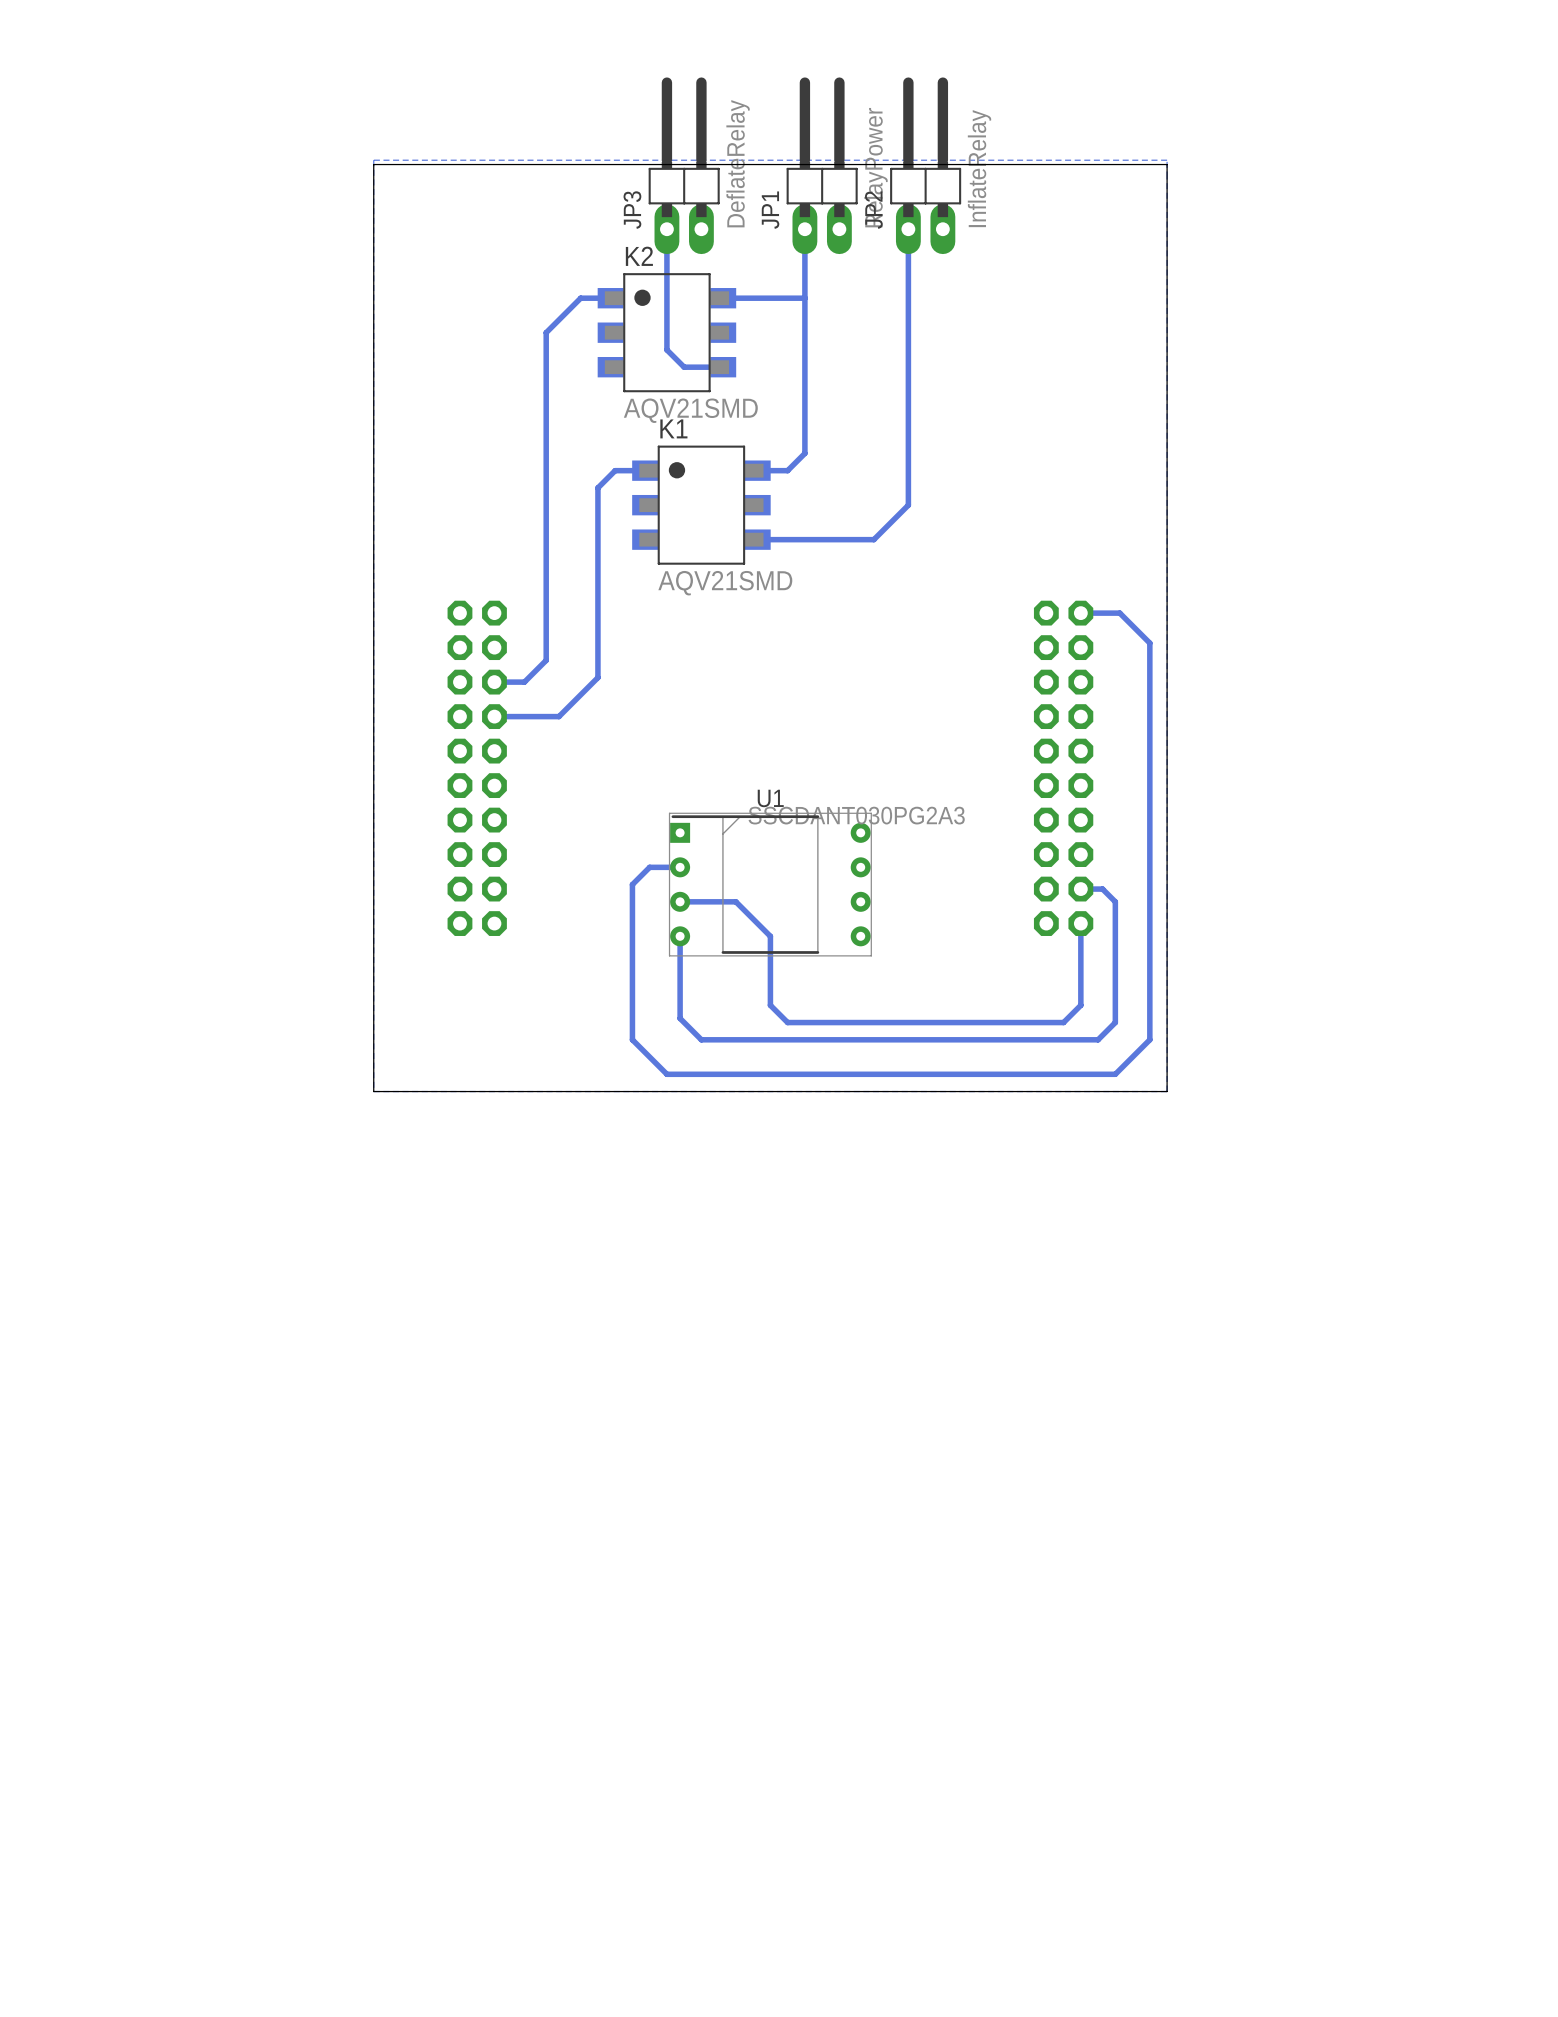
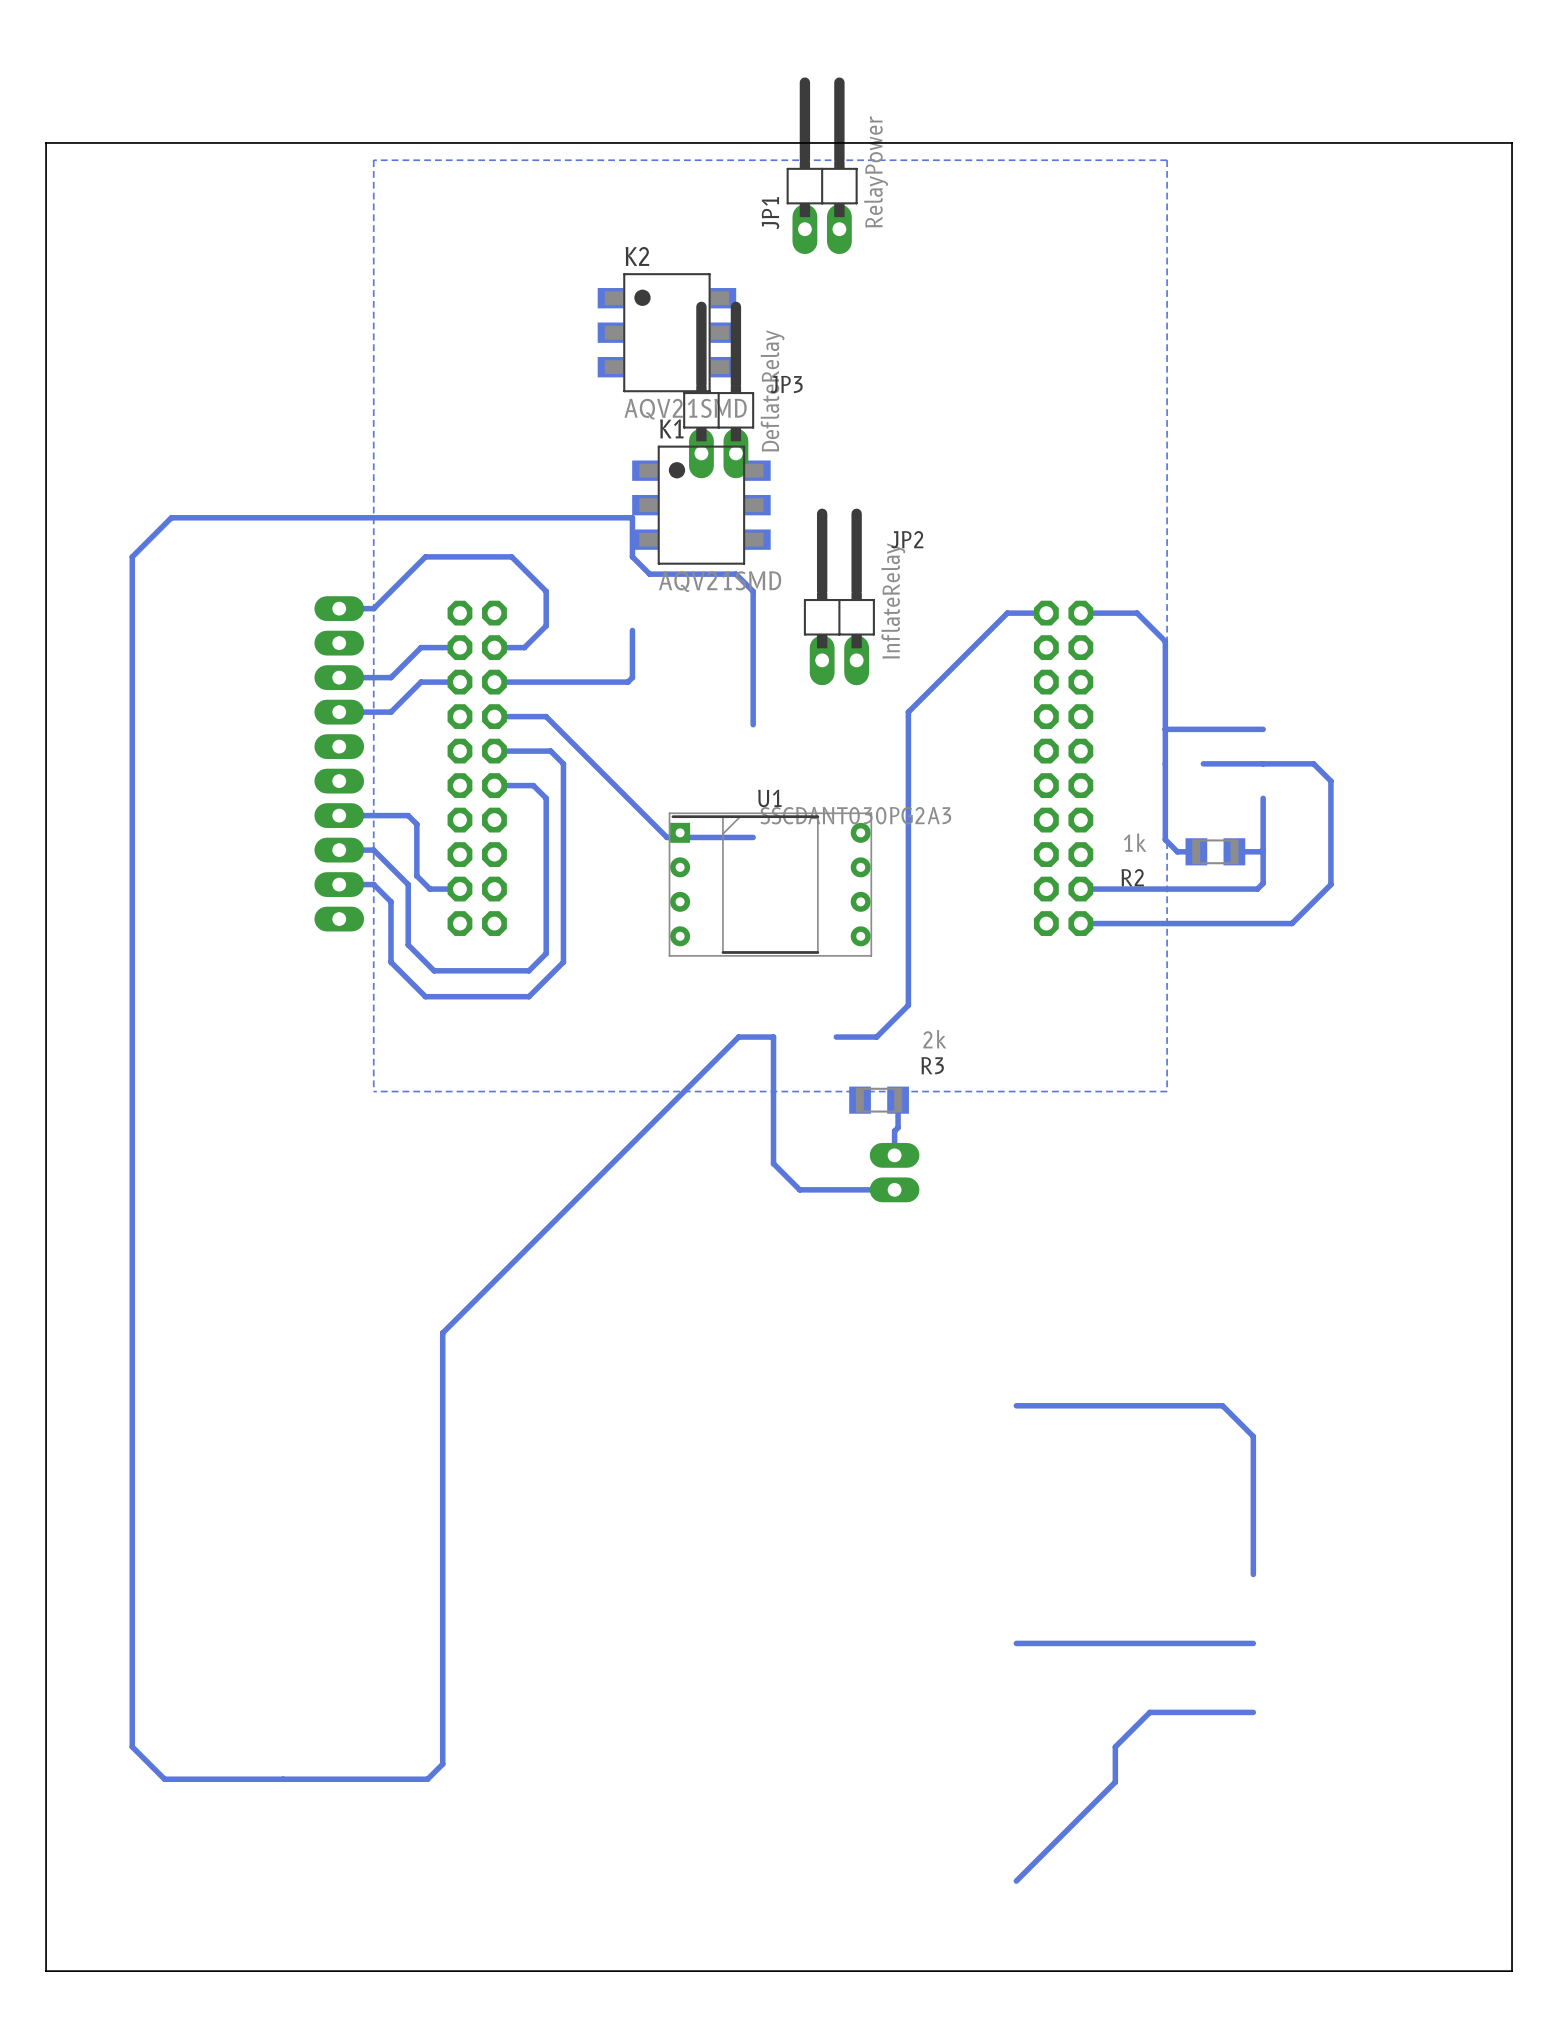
board edge: none -> (1512, 142) (46, 142) (46, 1971) (1512, 1971) (1512, 142)
board edge: (1167, 164) (373, 164) (373, 1091) (1167, 1091) (1167, 164) -> none
JP3 position: (684, 165) -> (718, 389)
JP2 position: (925, 165) -> (839, 596)
JP3 name rotation: 0° (632, 210) -> 90° clockwise (786, 384)
JP3 name position: JP3 (632, 210) -> JP3 (786, 384)
JP2 name rotation: 0° (873, 210) -> 90° clockwise (907, 539)
JP2 name position: JP2 (873, 210) -> JP2 (907, 539)
track: (666, 229) (666, 349) (684, 367) (723, 367) -> none
track: (804, 229) (804, 453) (787, 470) (757, 470) -> none
track: (908, 229) (908, 505) (873, 539) (757, 539) -> none
track: (610, 298) (580, 298) (546, 332) (546, 591) -> (339, 608) (373, 608) (425, 556) (511, 556) (546, 591)
track: (804, 298) (723, 298) -> none
track: (645, 470) (615, 470) (597, 487) (597, 677) (558, 716) (546, 716) -> (753, 837) (666, 837) (546, 716)
track: none -> (1046, 613) (1007, 613) (908, 712) (908, 1005) (876, 1037) (836, 1037)
track: (1119, 613) (1149, 643) (1149, 1039) (1115, 1074) (666, 1074) (632, 1039) (632, 884) (649, 867) (680, 867) -> (1119, 613) (1137, 613) (1165, 641) (1165, 839) (1177, 851) (1196, 851)
track: (546, 625) (546, 660) (524, 682) -> (546, 625) (524, 647) (494, 647)
track: none -> (632, 630) (632, 677) (627, 682) (524, 682)
track: none -> (459, 647) (420, 647) (390, 677) (339, 677)
track: none -> (459, 682) (420, 682) (390, 712) (339, 712)
track: none -> (753, 724) (753, 591) (735, 574) (649, 574) (632, 556) (632, 517) (171, 517) (132, 556) (132, 1746) (164, 1779) (427, 1779) (442, 1764) (442, 1332) (738, 1037) (773, 1037) (773, 1163) (799, 1189) (894, 1189)
track: none -> (1263, 729) (1165, 729)
track: none -> (494, 751) (550, 751) (563, 763) (563, 962) (528, 996) (425, 996) (390, 962) (390, 901) (373, 884) (339, 884)
part: none -> (339, 763)
track: none -> (494, 785) (533, 785) (546, 798) (546, 953) (528, 970) (434, 970) (408, 944) (408, 884) (373, 850) (339, 850)
track: none -> (339, 815) (408, 815) (416, 824) (416, 875) (429, 889) (459, 889)
track: none -> (1263, 850) (1261, 851) (1234, 851)
R2: none -> 1k (1215, 851)
track: (1102, 889) (1115, 901) (1115, 1022) (1098, 1039) (701, 1039) (680, 1018) (680, 936) -> (1102, 889) (1257, 889) (1263, 883) (1263, 798)
track: (680, 901) (735, 901) (770, 936) (770, 1005) (787, 1022) (1063, 1022) (1080, 1005) (1080, 923) -> (1203, 763) (1313, 763) (1330, 781) (1330, 884) (1291, 923) (1080, 923)
R3: none -> 2k (879, 1100)
track: none -> (898, 1100) (898, 1127) (894, 1131) (894, 1155)
part: none -> (894, 1172)
track: none -> (1016, 1405) (1222, 1405) (1253, 1436) (1253, 1574)
track: none -> (1253, 1643) (1016, 1643)
track: none -> (1253, 1712) (1149, 1712) (1115, 1746) (1115, 1782) (1016, 1881)

